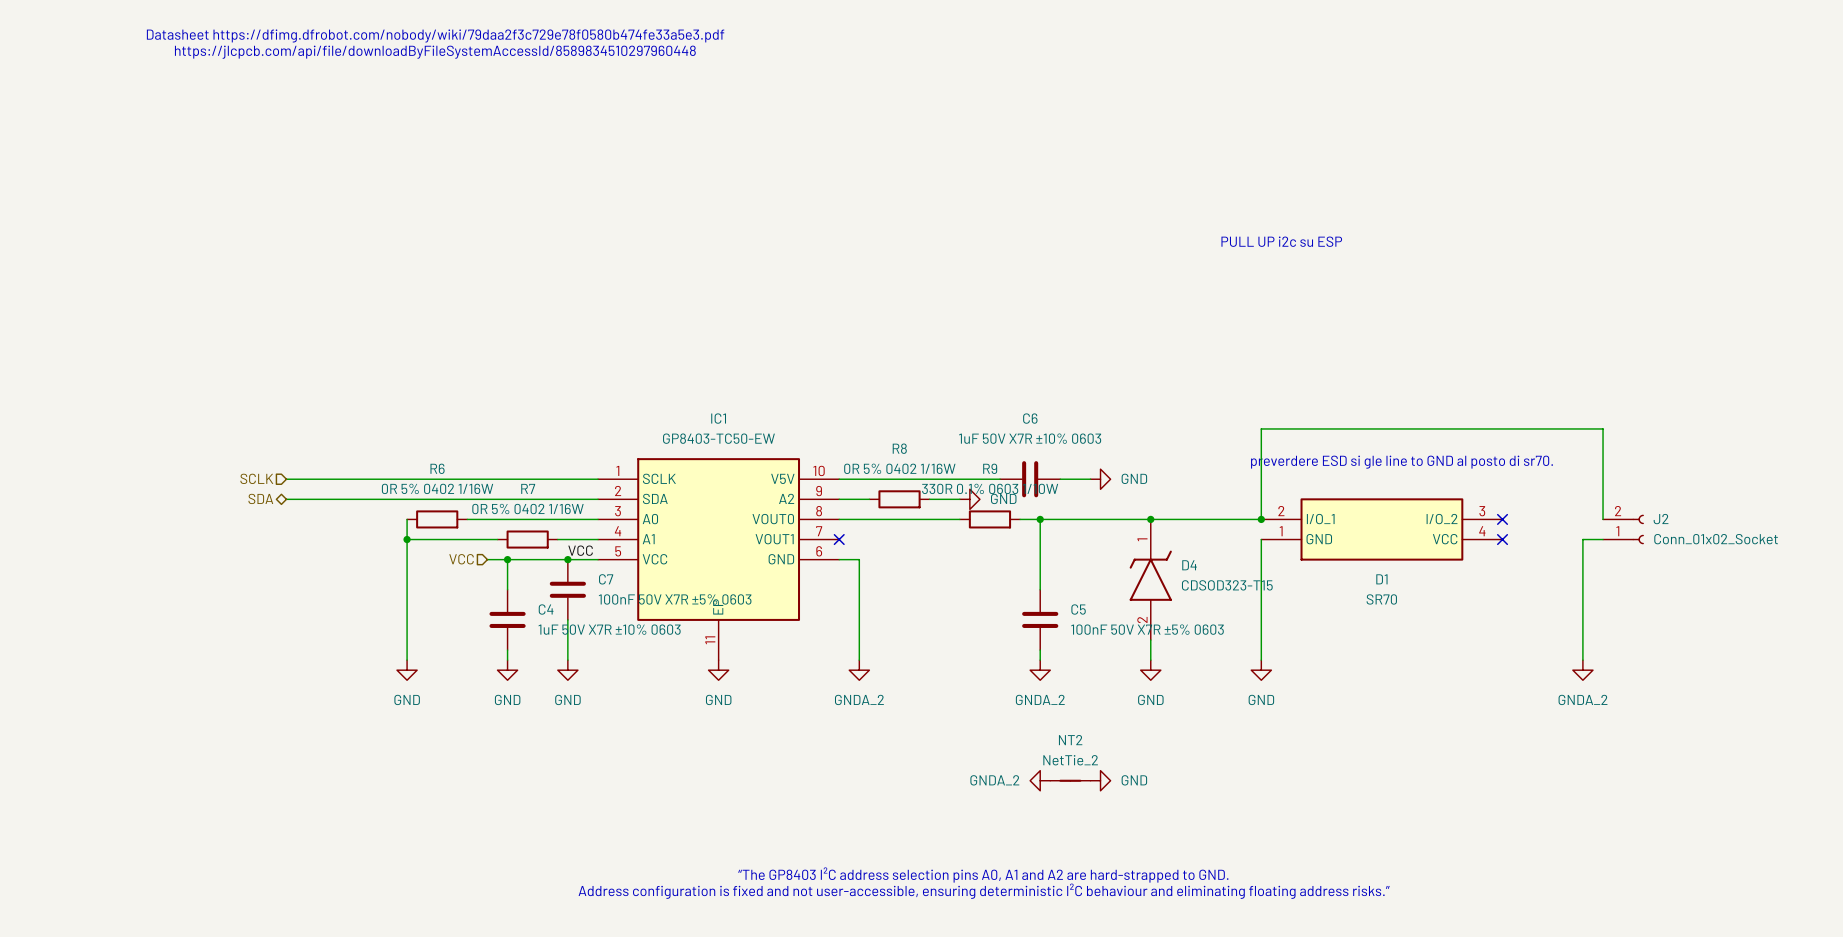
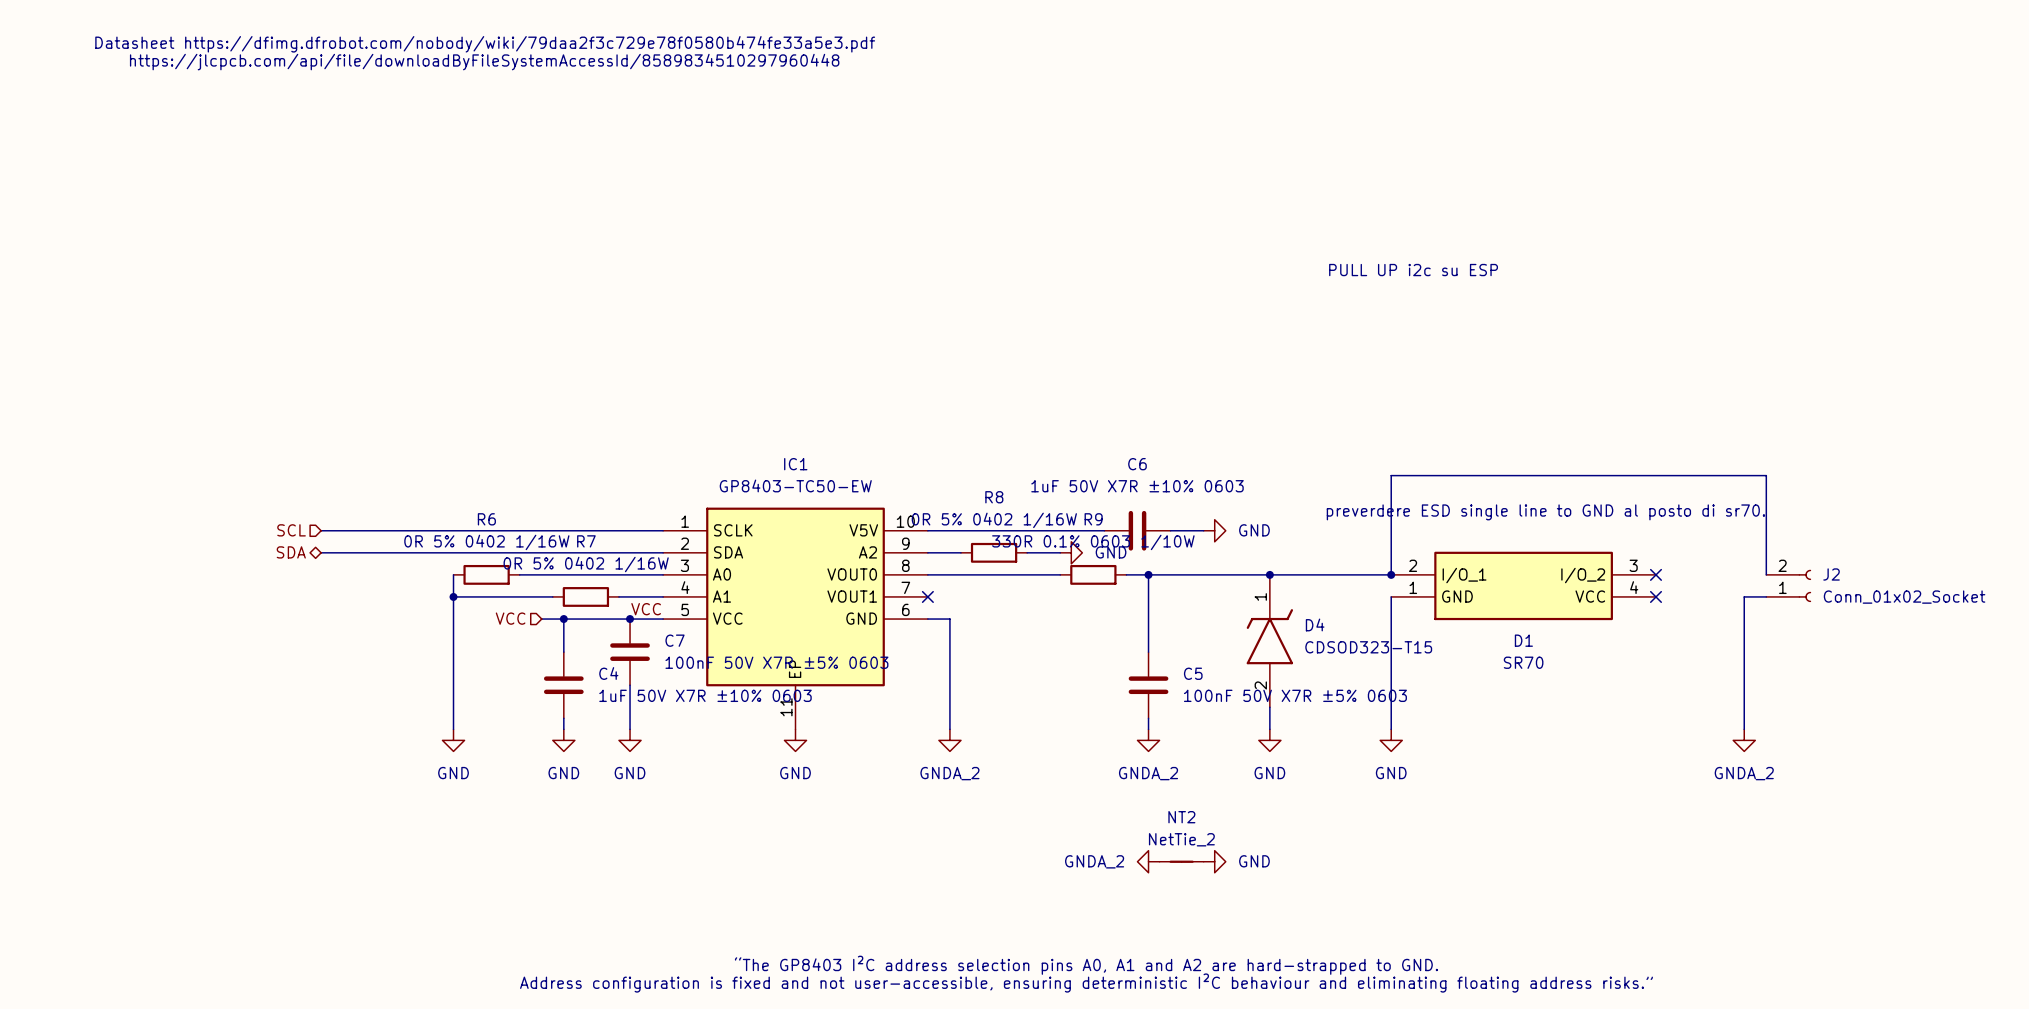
text: preverdere ESD si gle line to GND al posto di sr70. (1402, 462) -> preverdere ESD single line to GND al posto di sr70. (1545, 512)
hierarchical label: SCLK (256, 478) -> SCL (291, 530)

